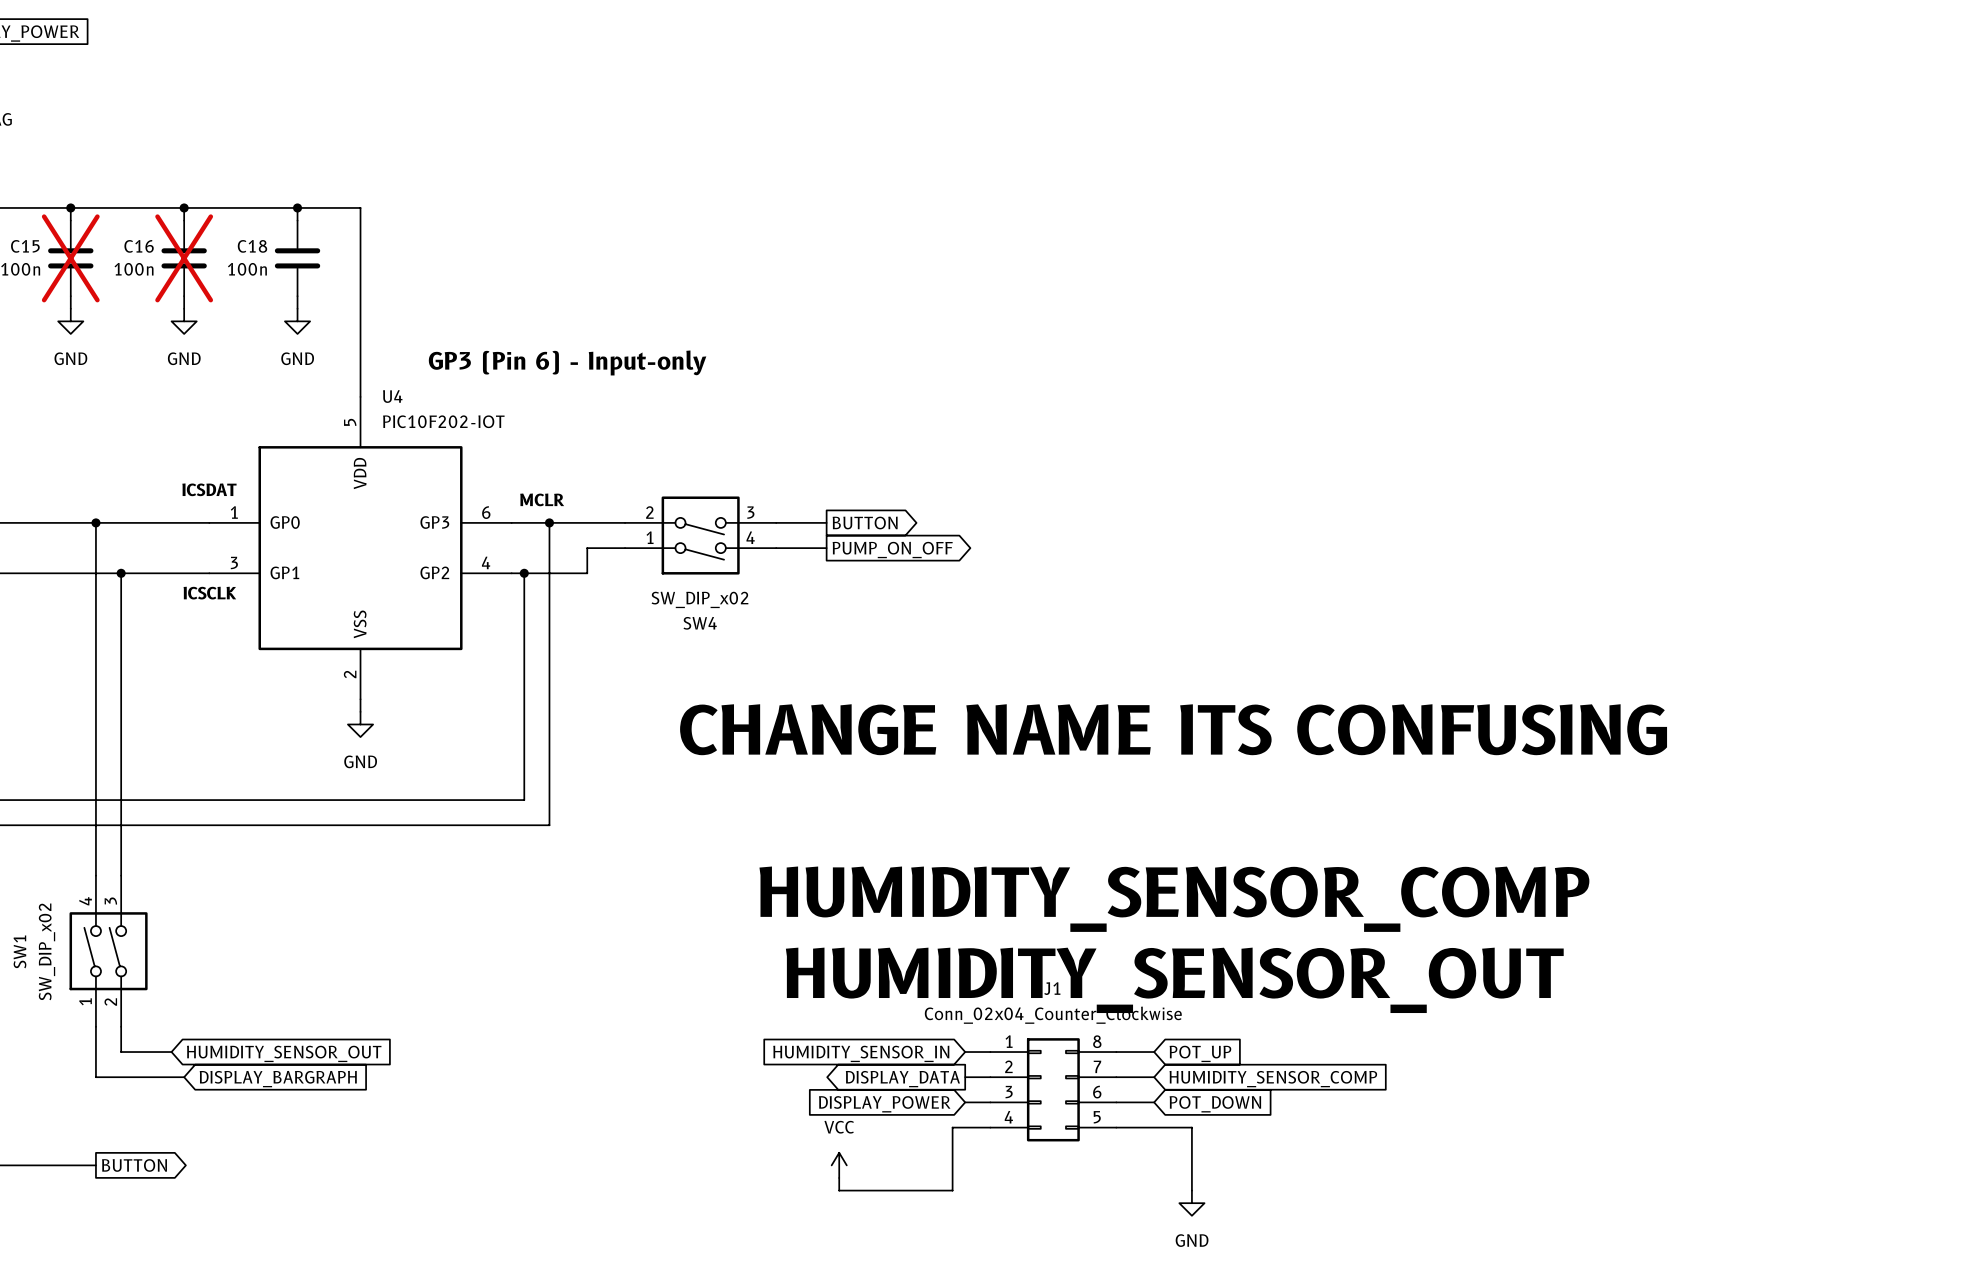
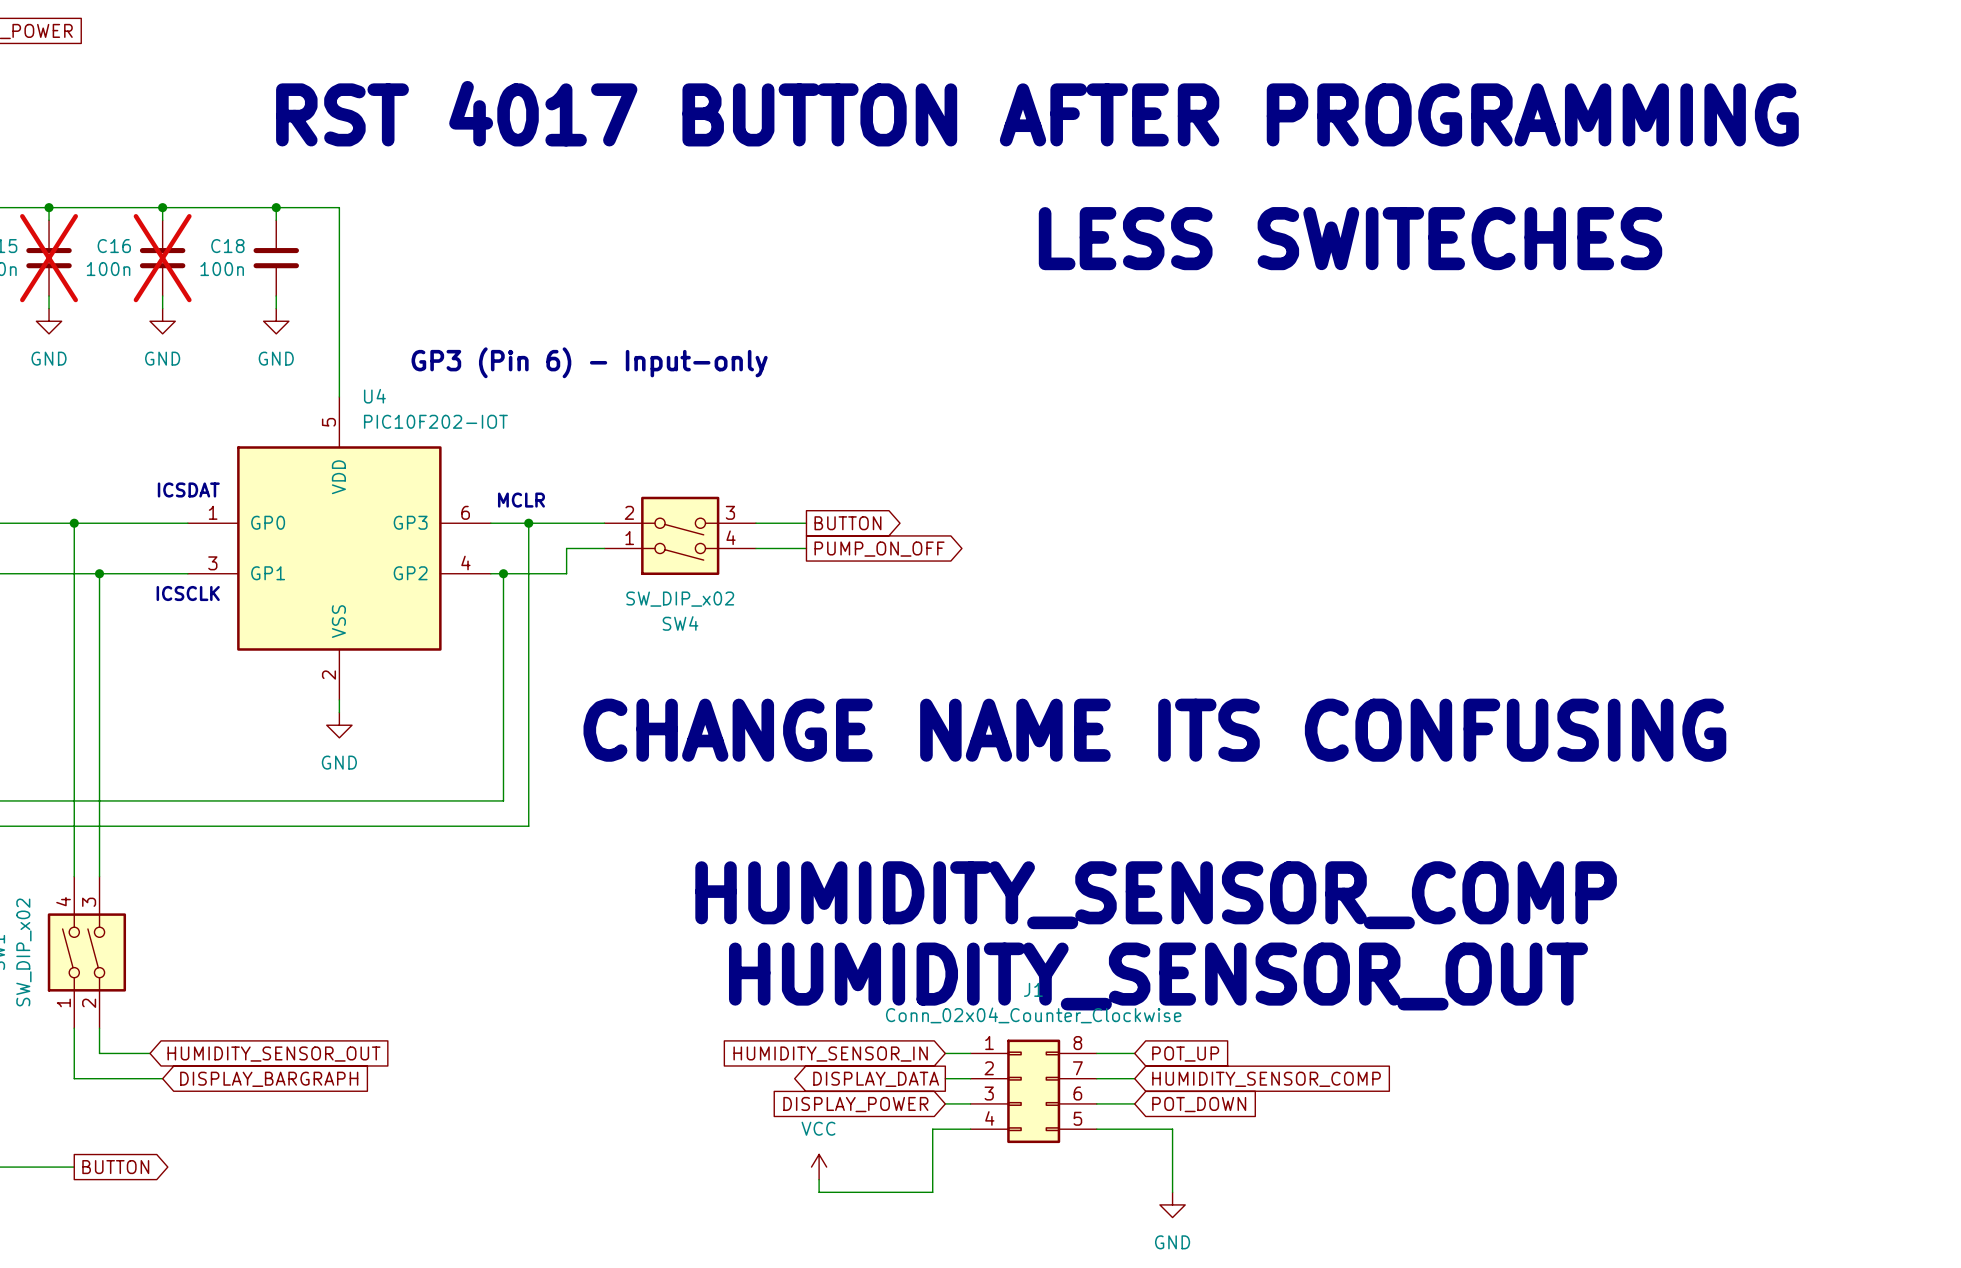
text: none -> RST 4017 BUTTON AFTER PROGRAMMING (1037, 113)
text: none -> LESS SWITECHES (1350, 238)

